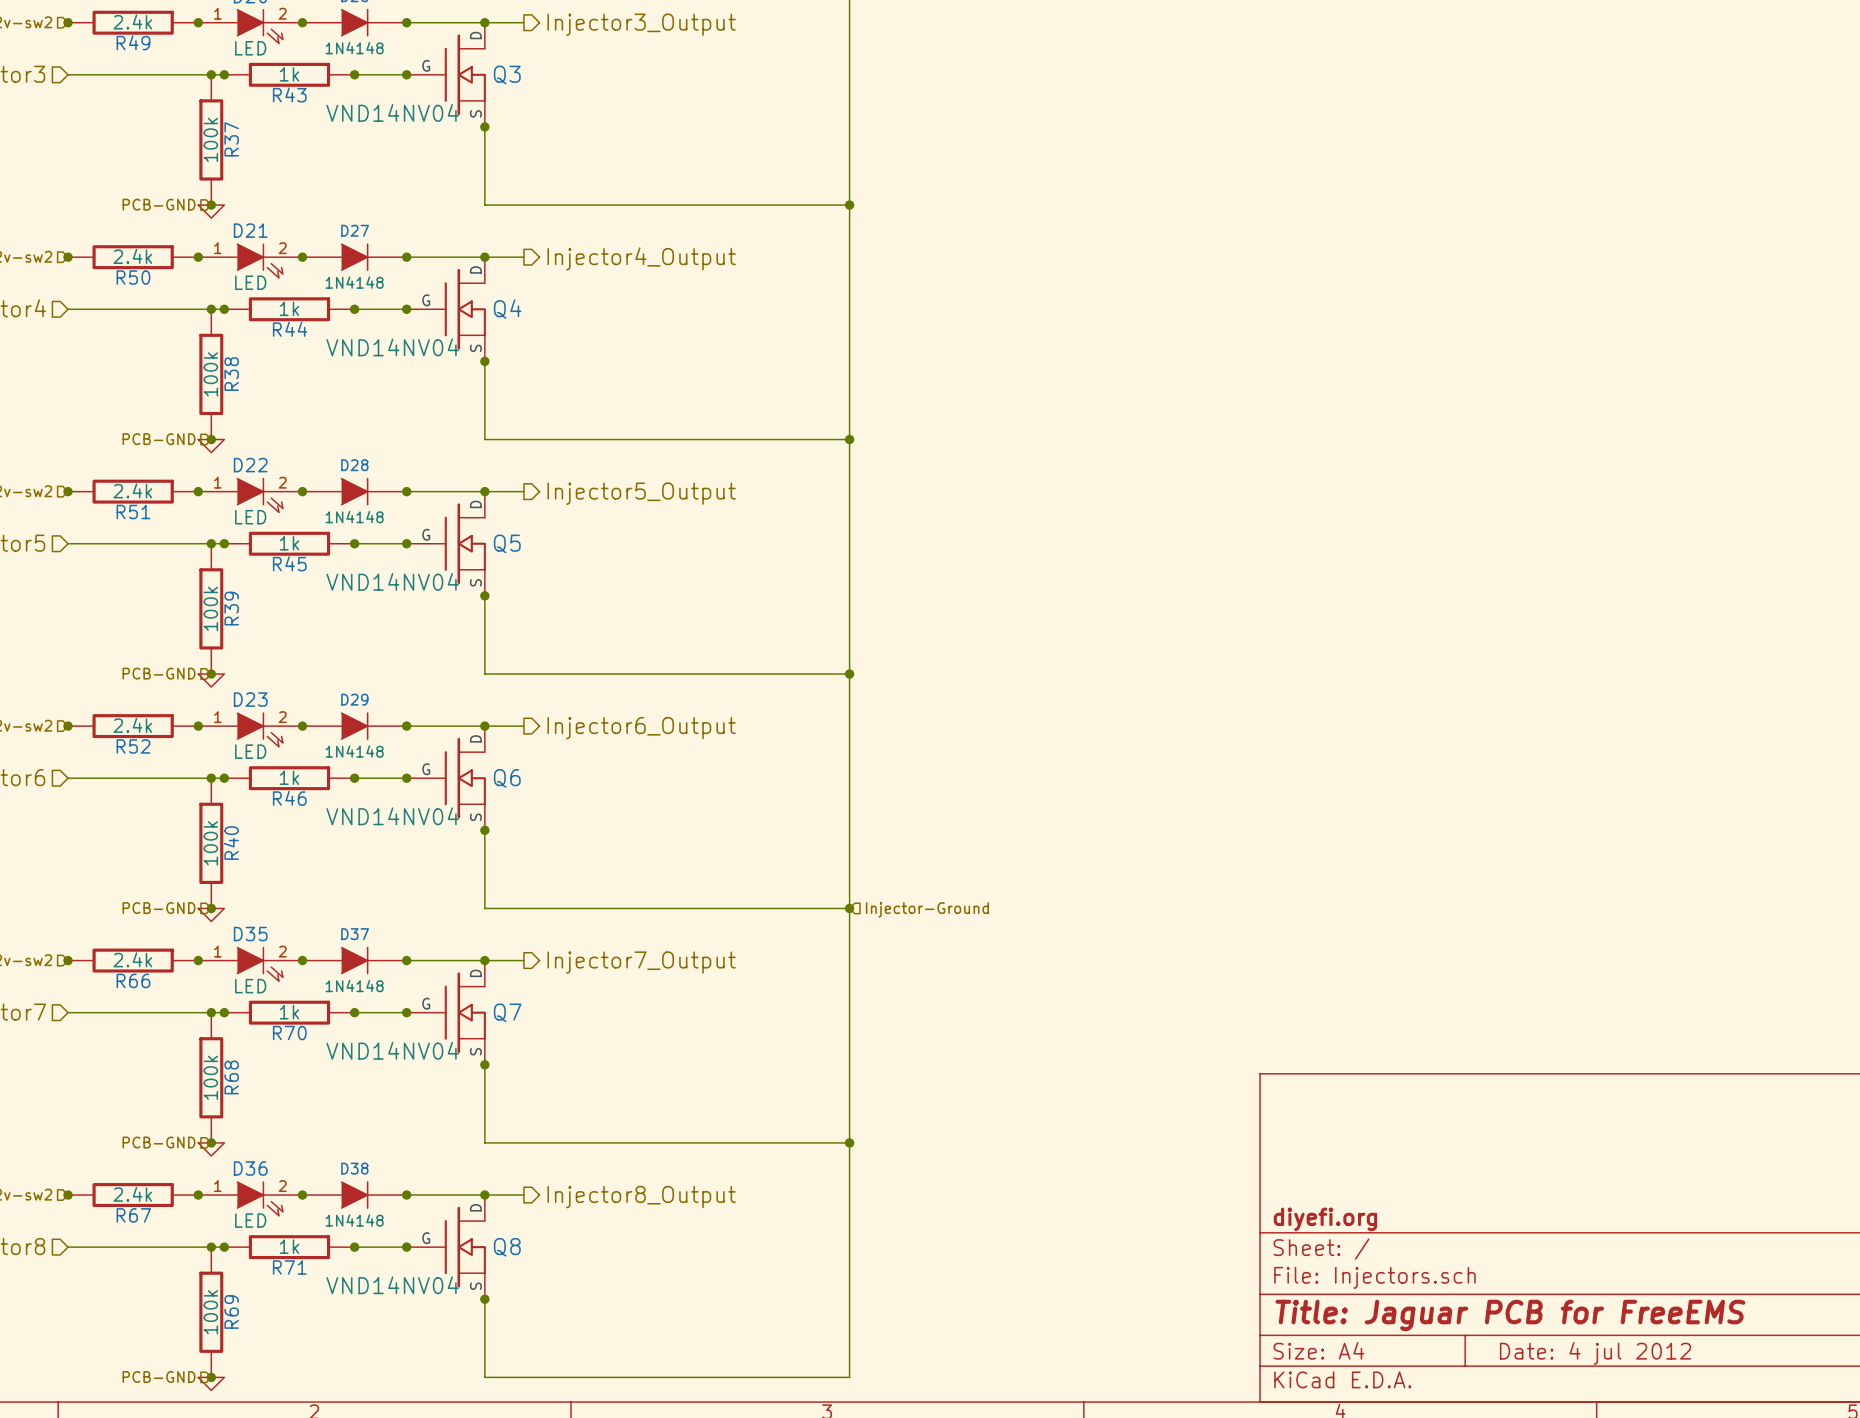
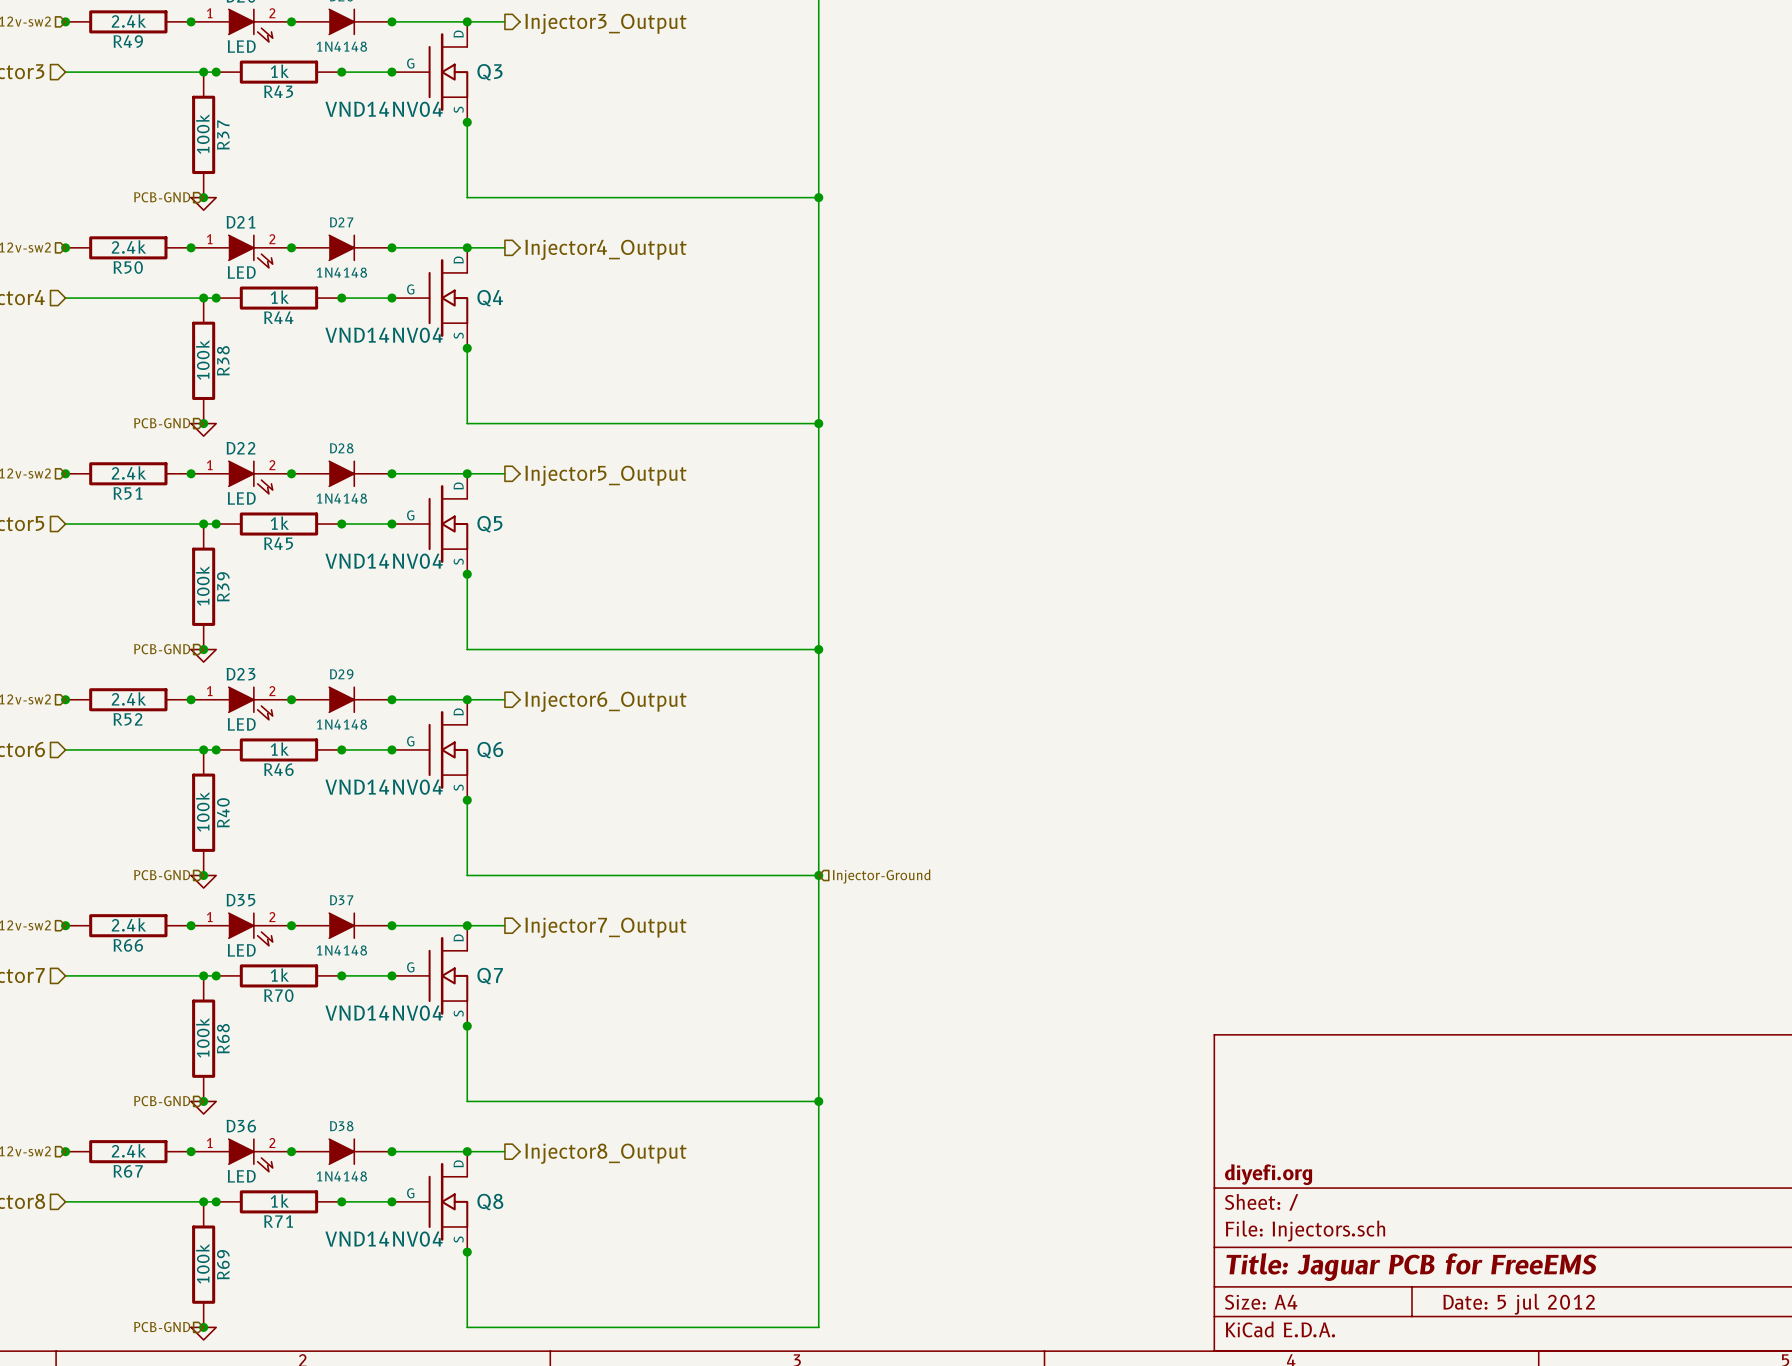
title block: Date: 4 jul 2012 (1595, 1353) -> Date: 5 jul 2012 (1519, 1304)

